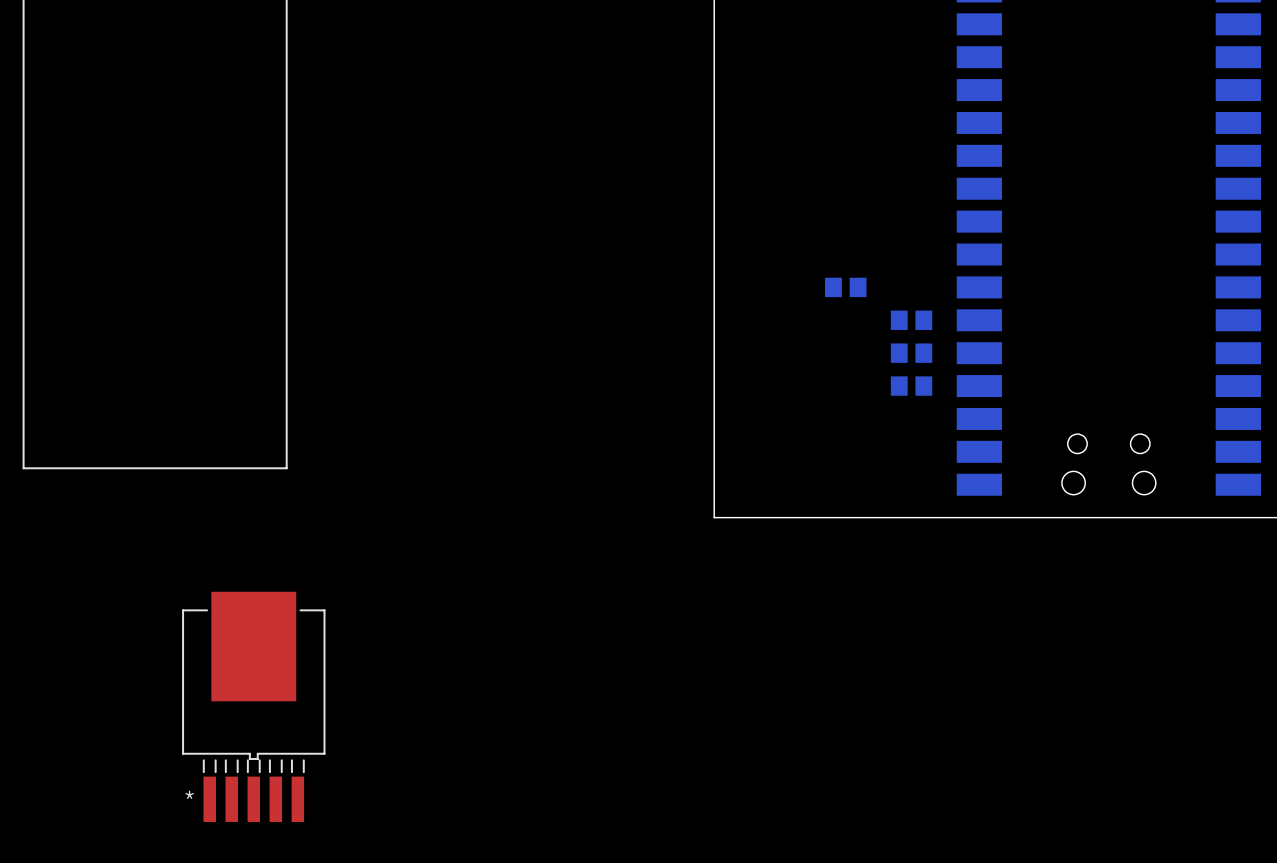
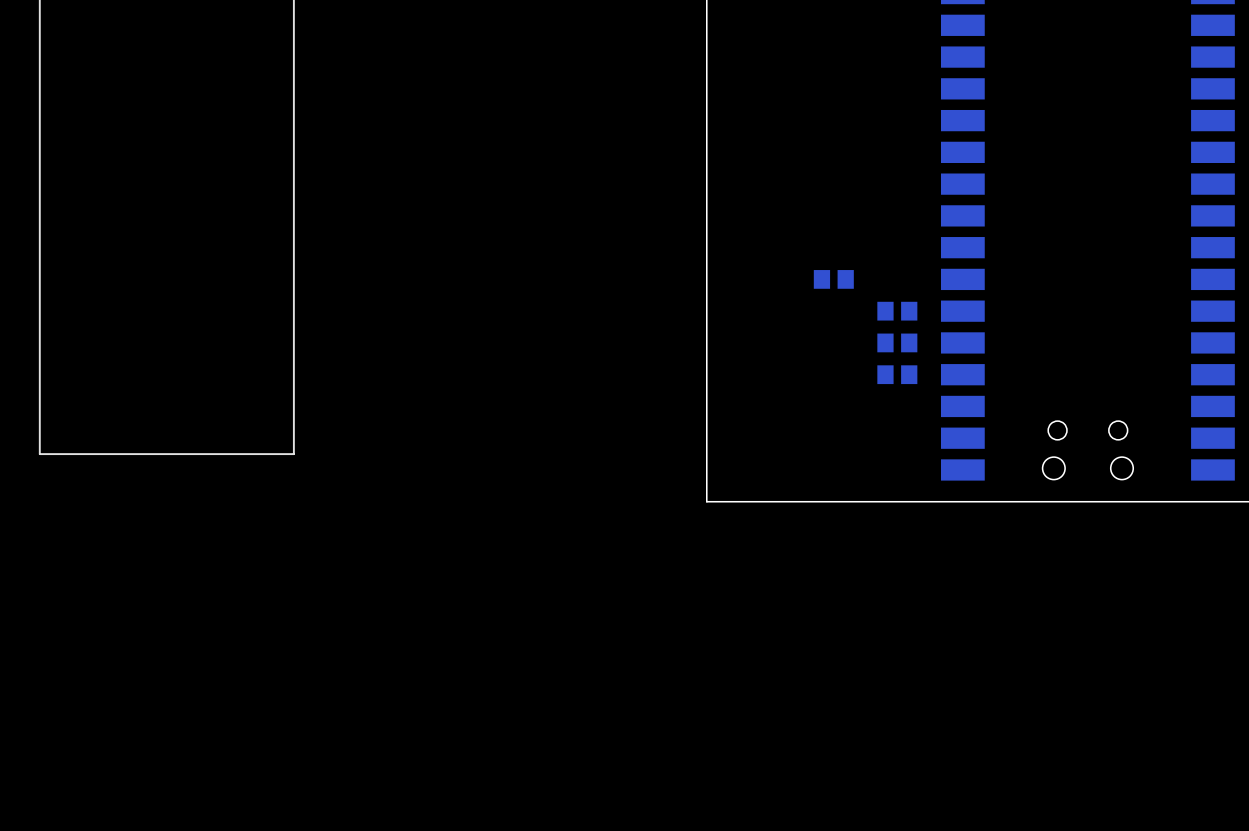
part: (253, 706) -> none

